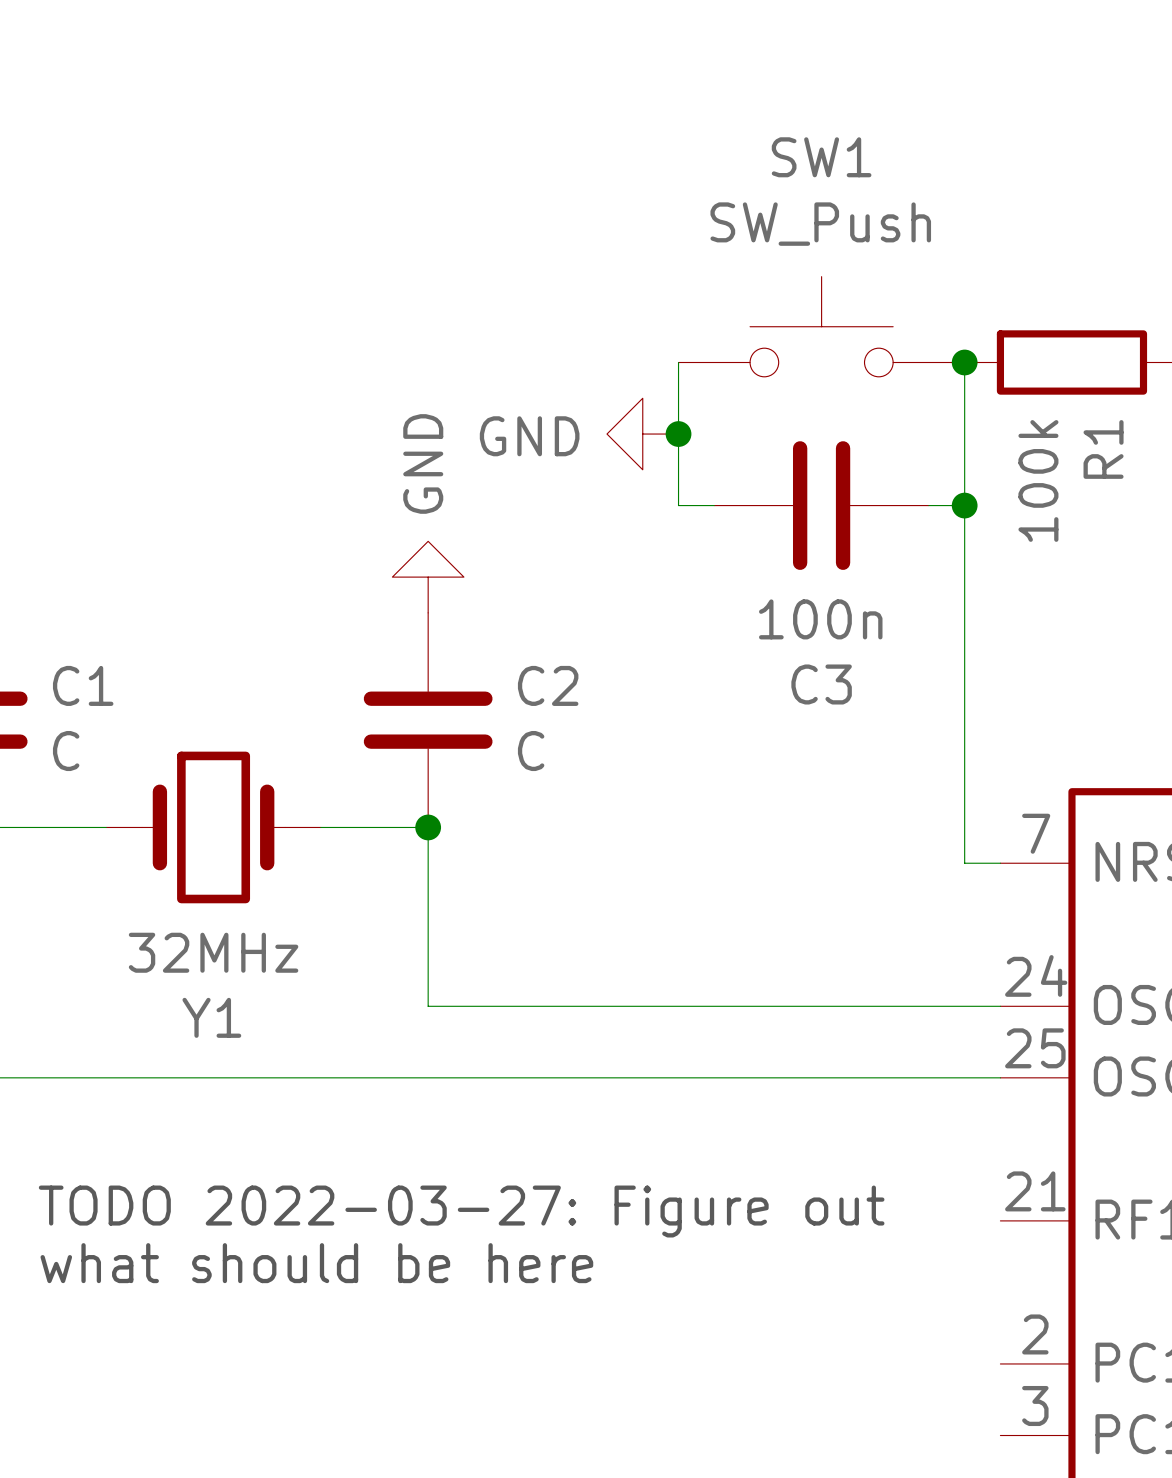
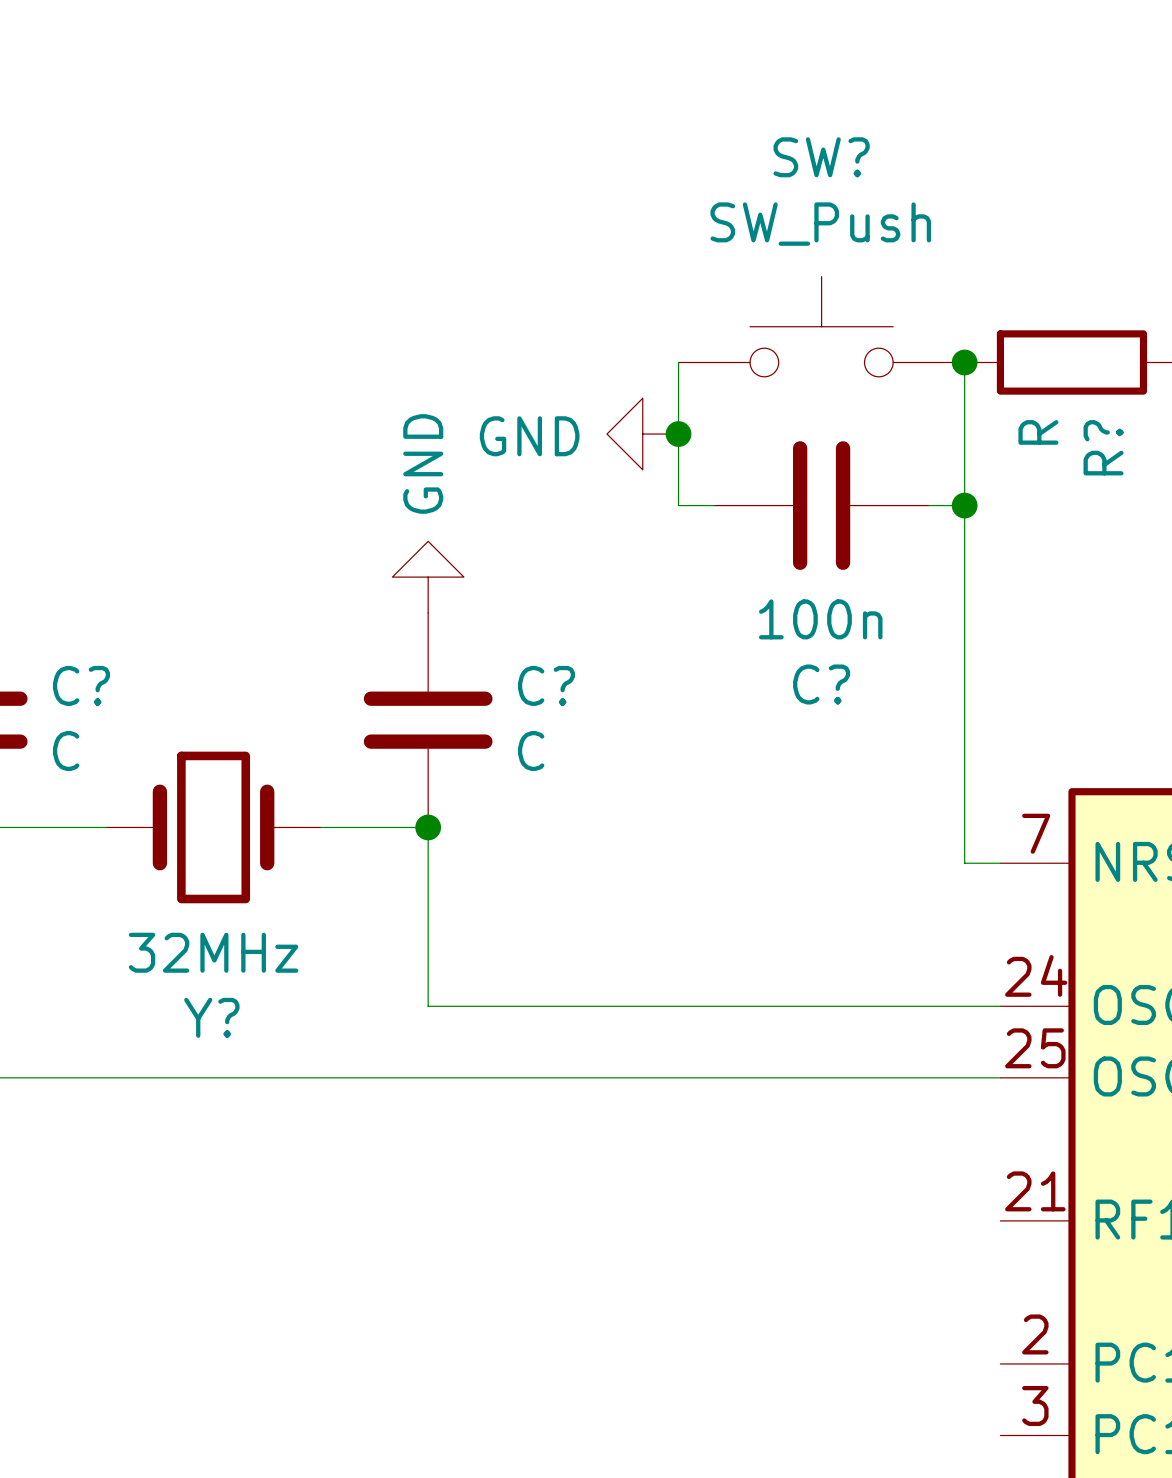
SW1 name: SW1 (821, 157) -> SW? (821, 157)
R1 name: R1 (1103, 449) -> R? (1103, 447)
R1 value: 100k (1038, 480) -> R (1038, 432)
C3 name: C3 (821, 684) -> C? (821, 684)
C1 name: C1 (83, 685) -> C? (81, 685)
C2 name: C2 (548, 685) -> C? (546, 685)
Y1 name: Y1 (211, 1017) -> Y? (211, 1017)
text: TODO 2022-03-27: Figure out (461, 1211) -> none
text: what should be here (316, 1263) -> none

